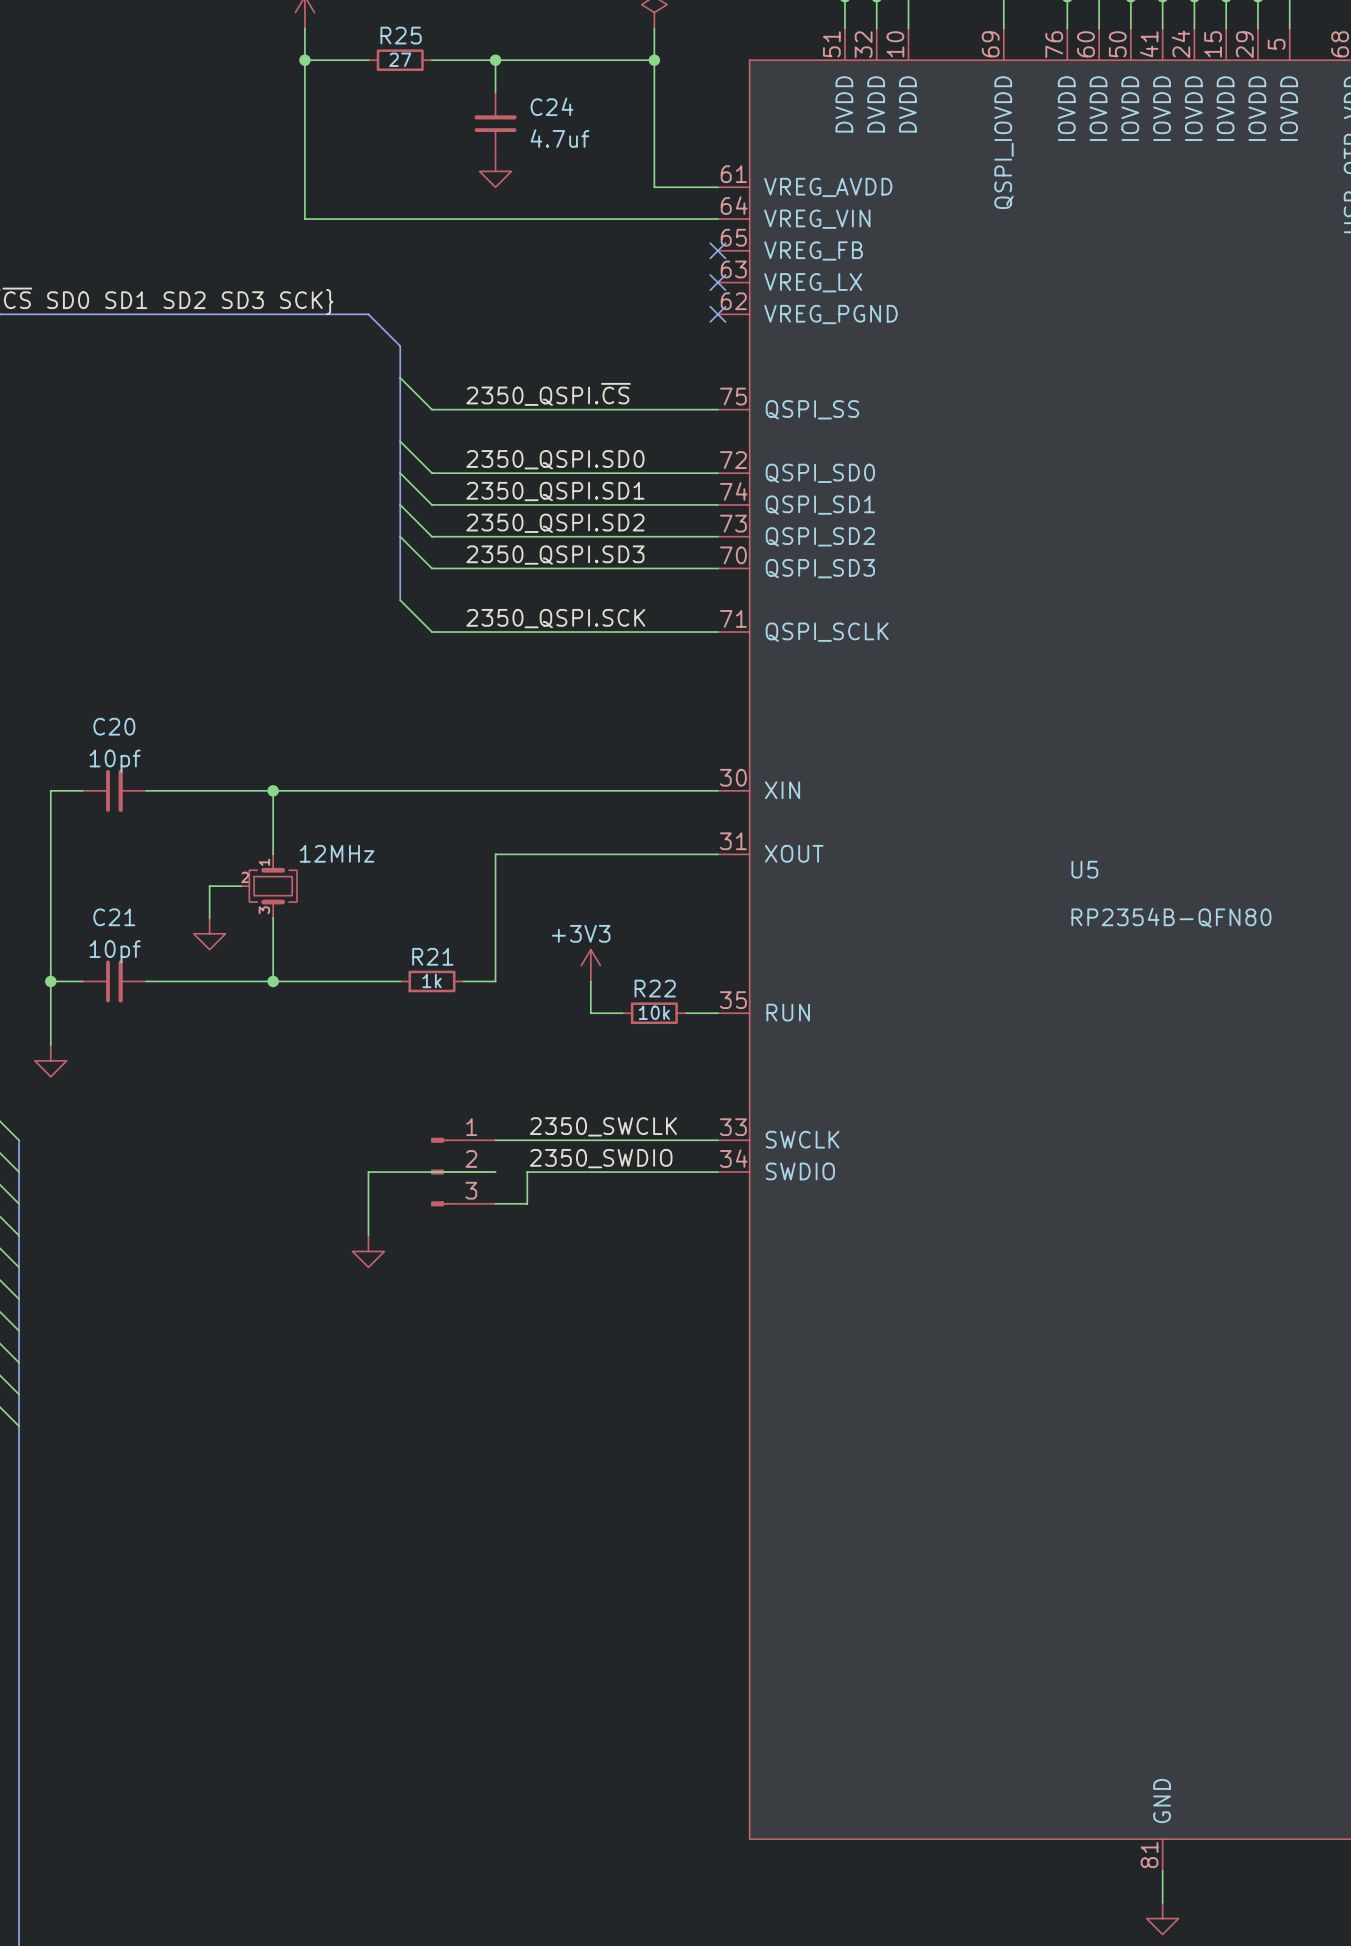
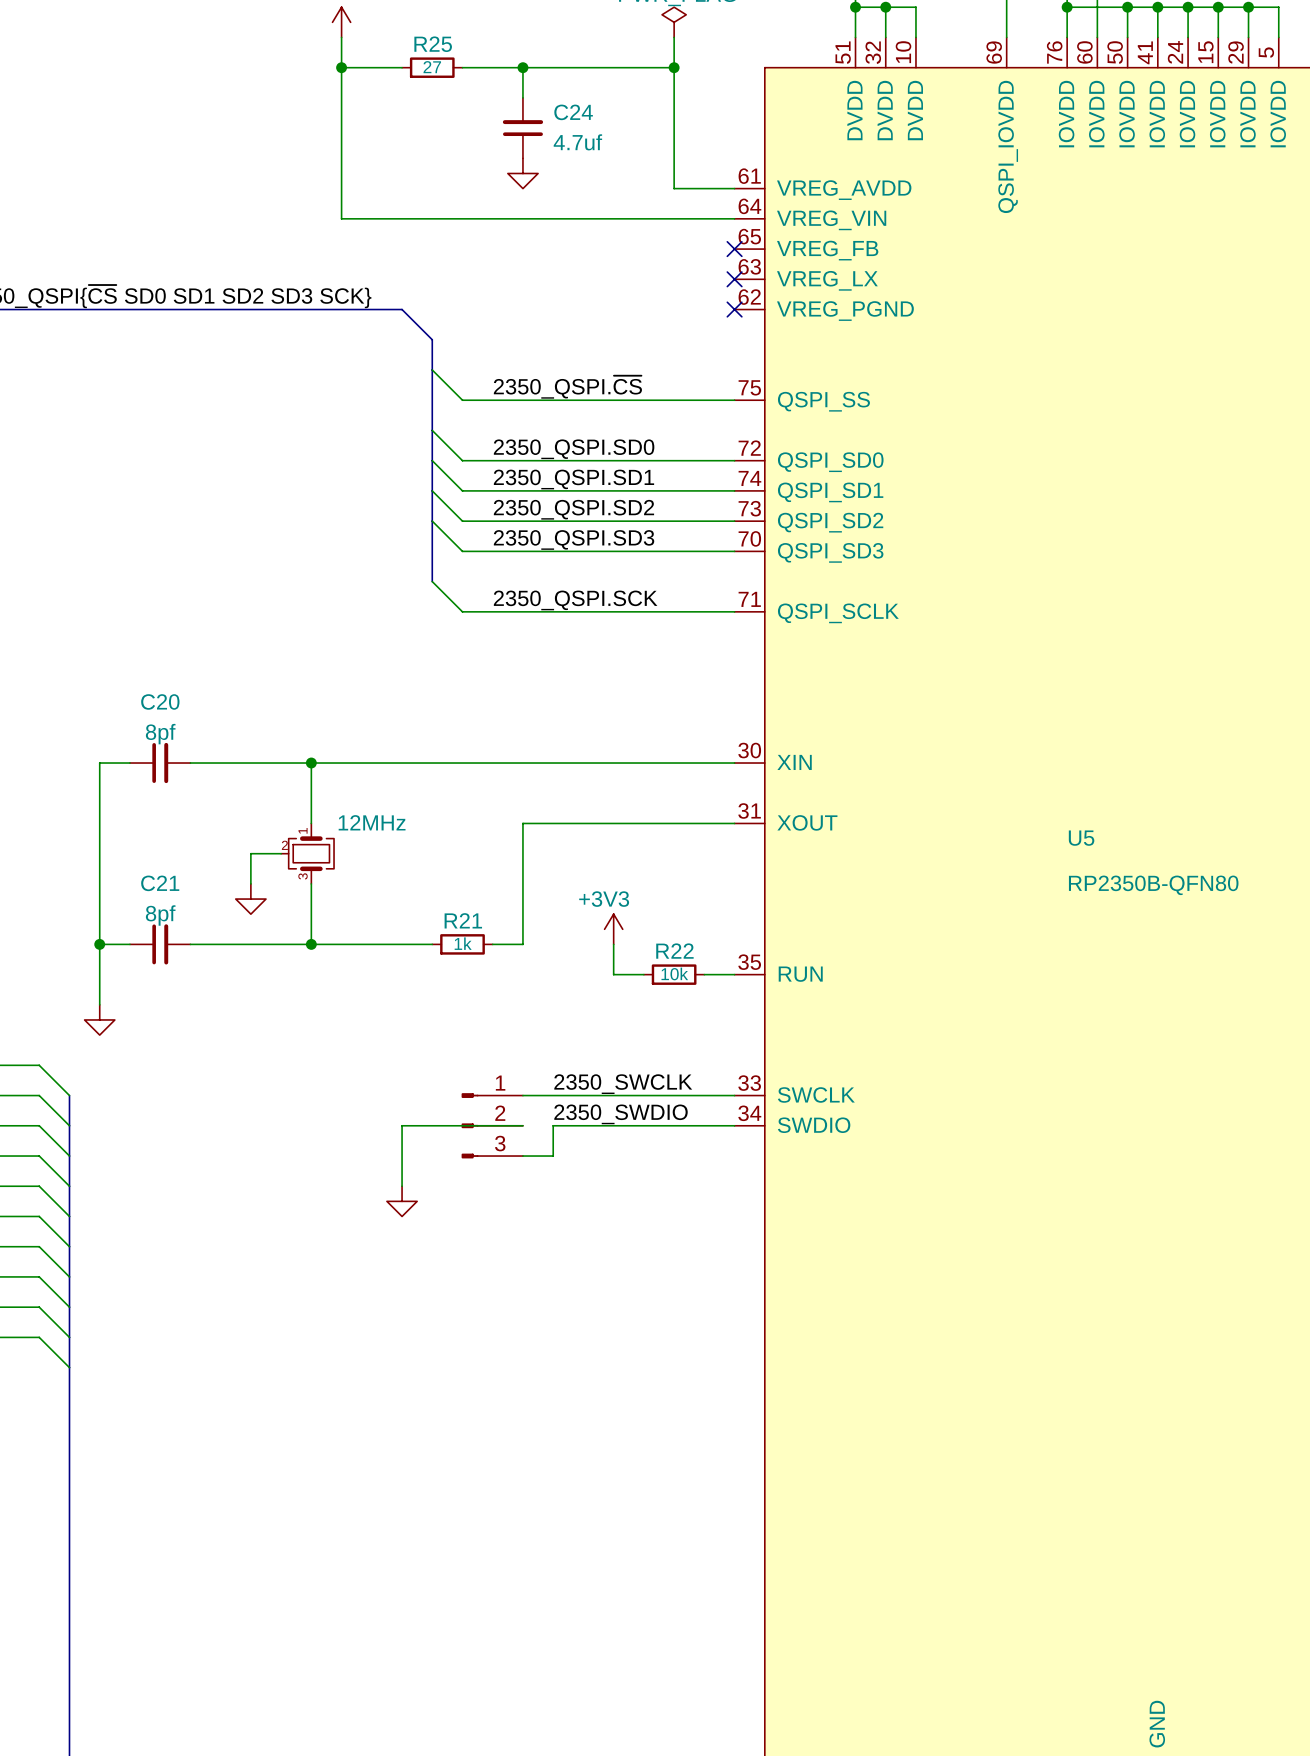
C20 value: 10pf (115, 761) -> 8pf (160, 734)
U5 value: RP2354B-QFN80 (1171, 917) -> RP2350B-QFN80 (1153, 885)
C21 value: 10pf (115, 951) -> 8pf (160, 915)

